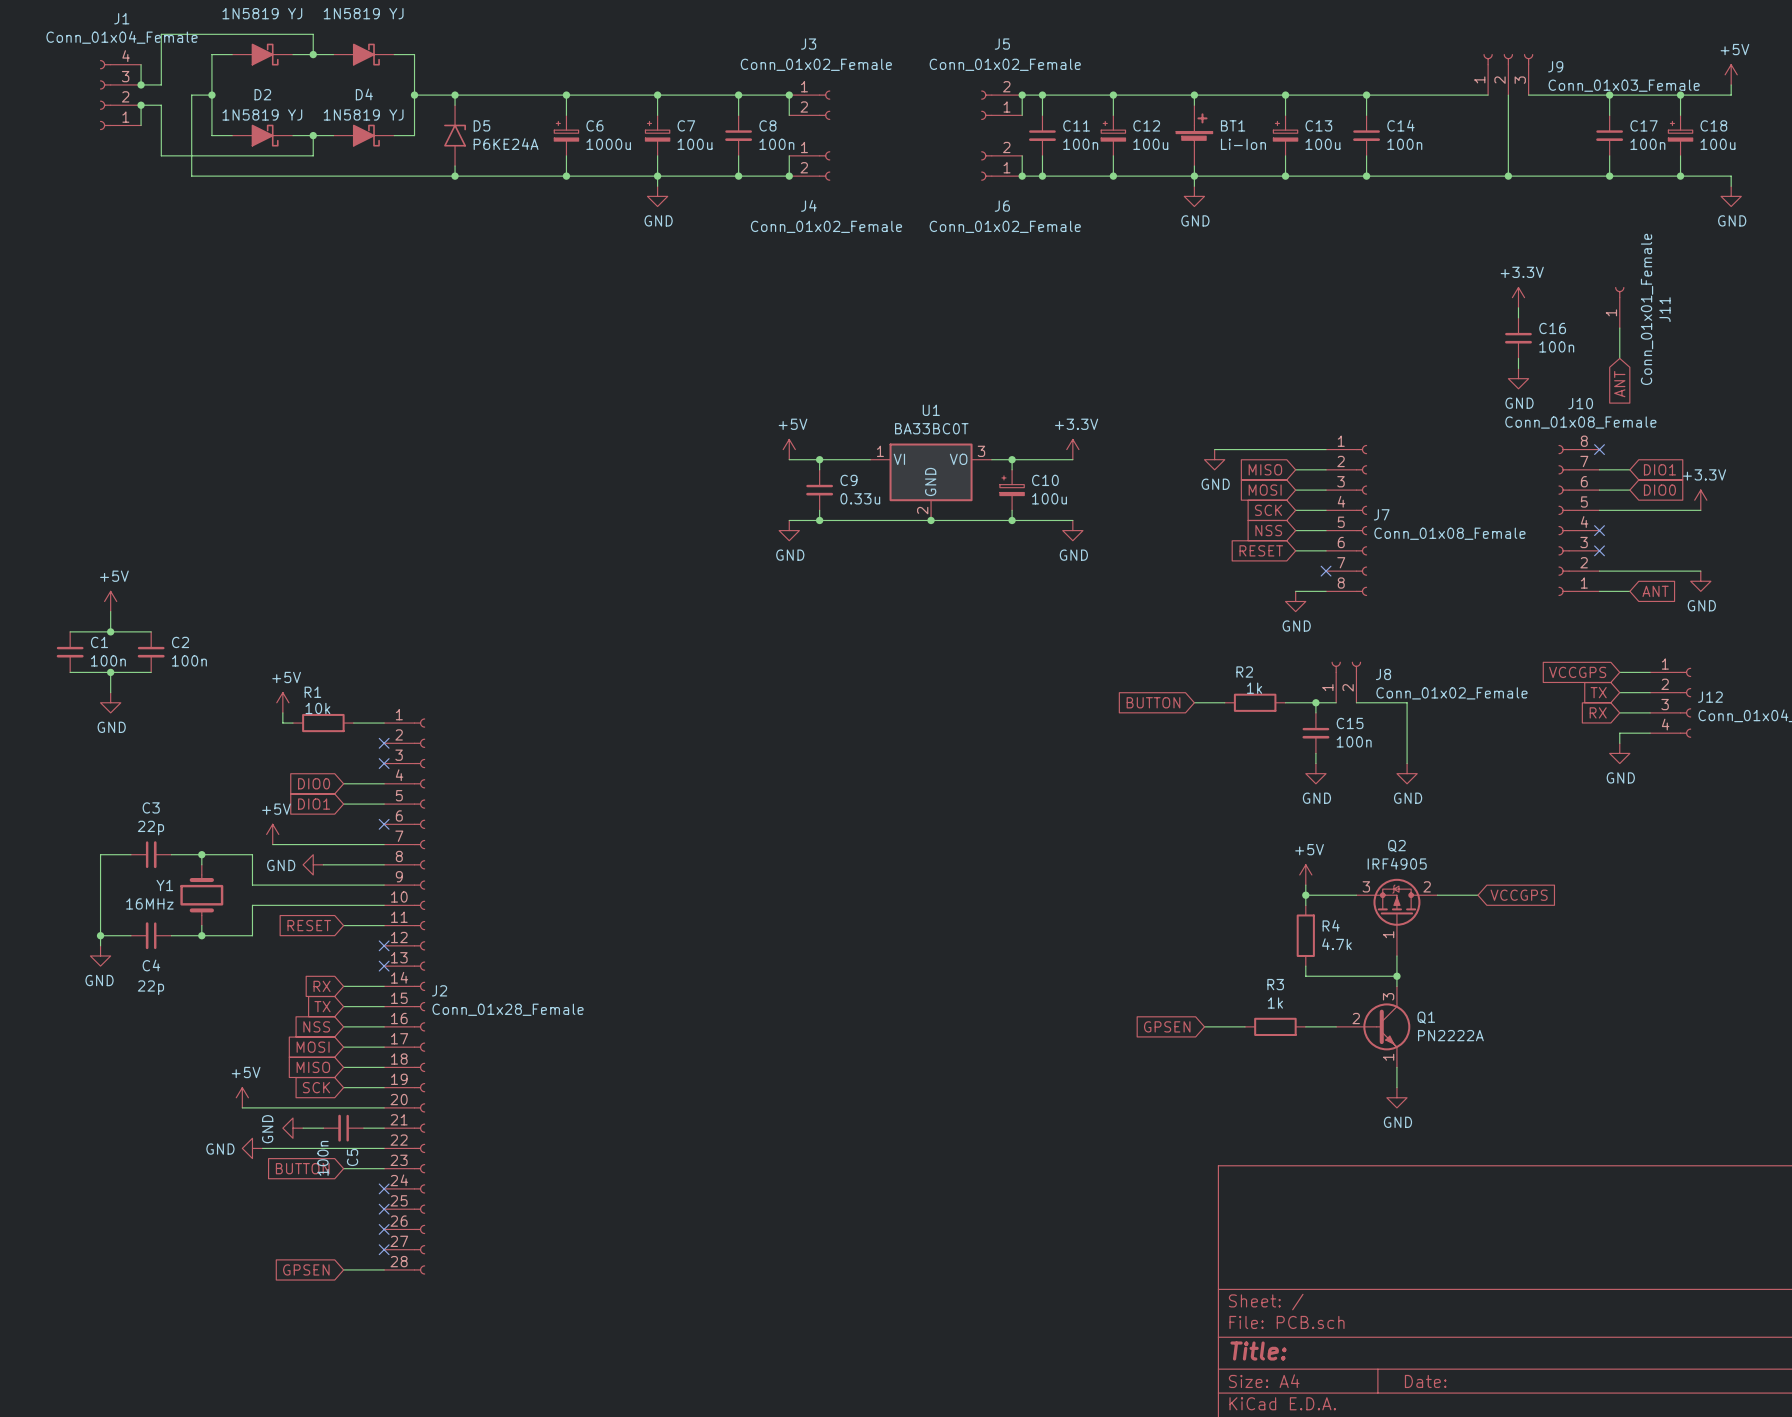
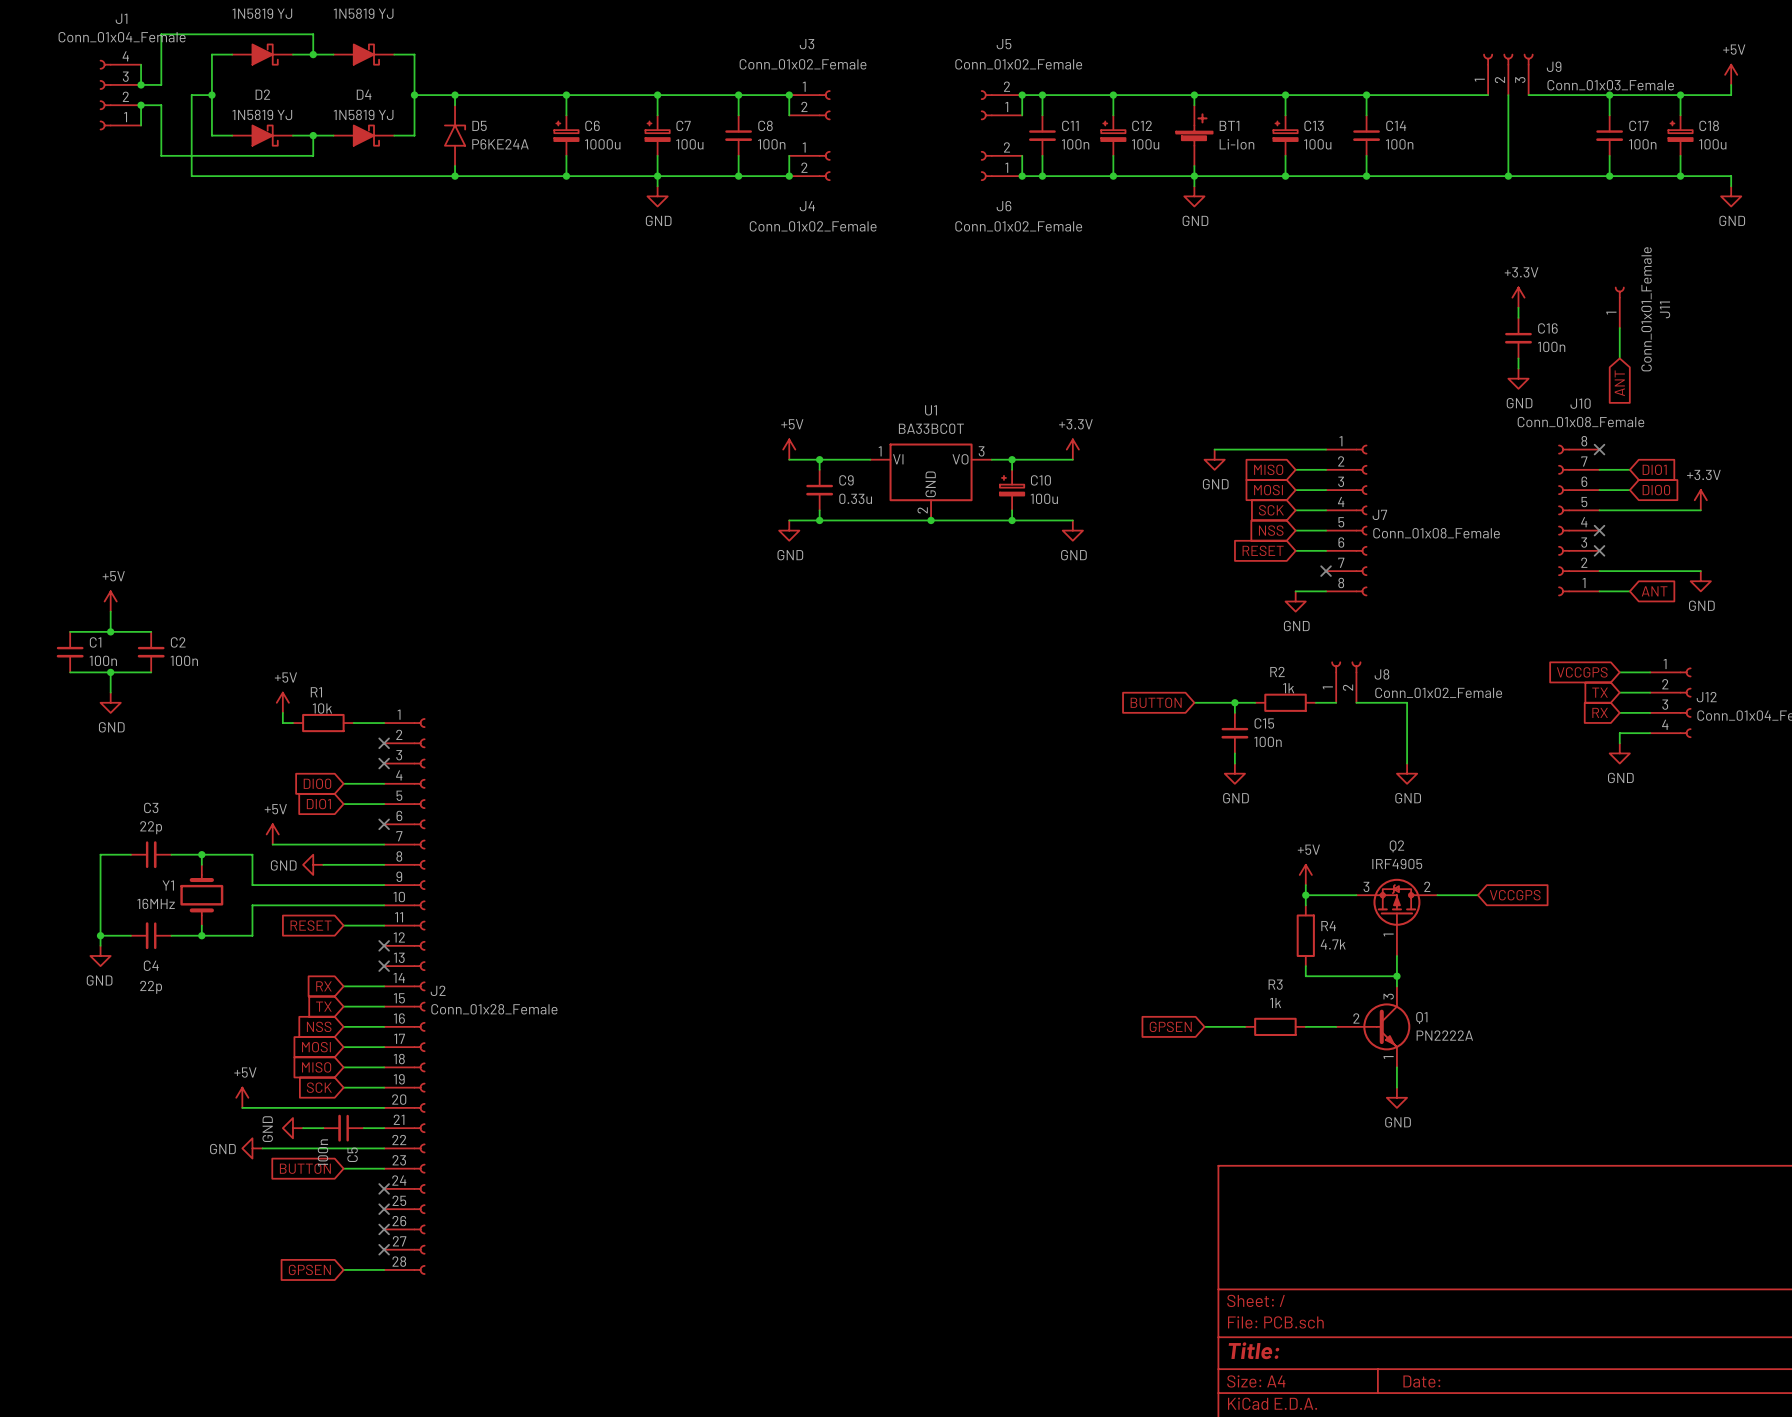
wire: none -> (1224, 702) (1255, 702)
junction: none -> (1234, 702)
R2 position: (1255, 702) -> (1285, 702)
wire: (1285, 702) (1315, 702) (1315, 712) -> none
junction: (1315, 702) -> none
C15 position: (1315, 733) -> (1234, 733)
wire: (1315, 753) (1315, 763) -> (1234, 753) (1234, 763)
power symbol position: GND (1315, 773) -> GND (1234, 773)

